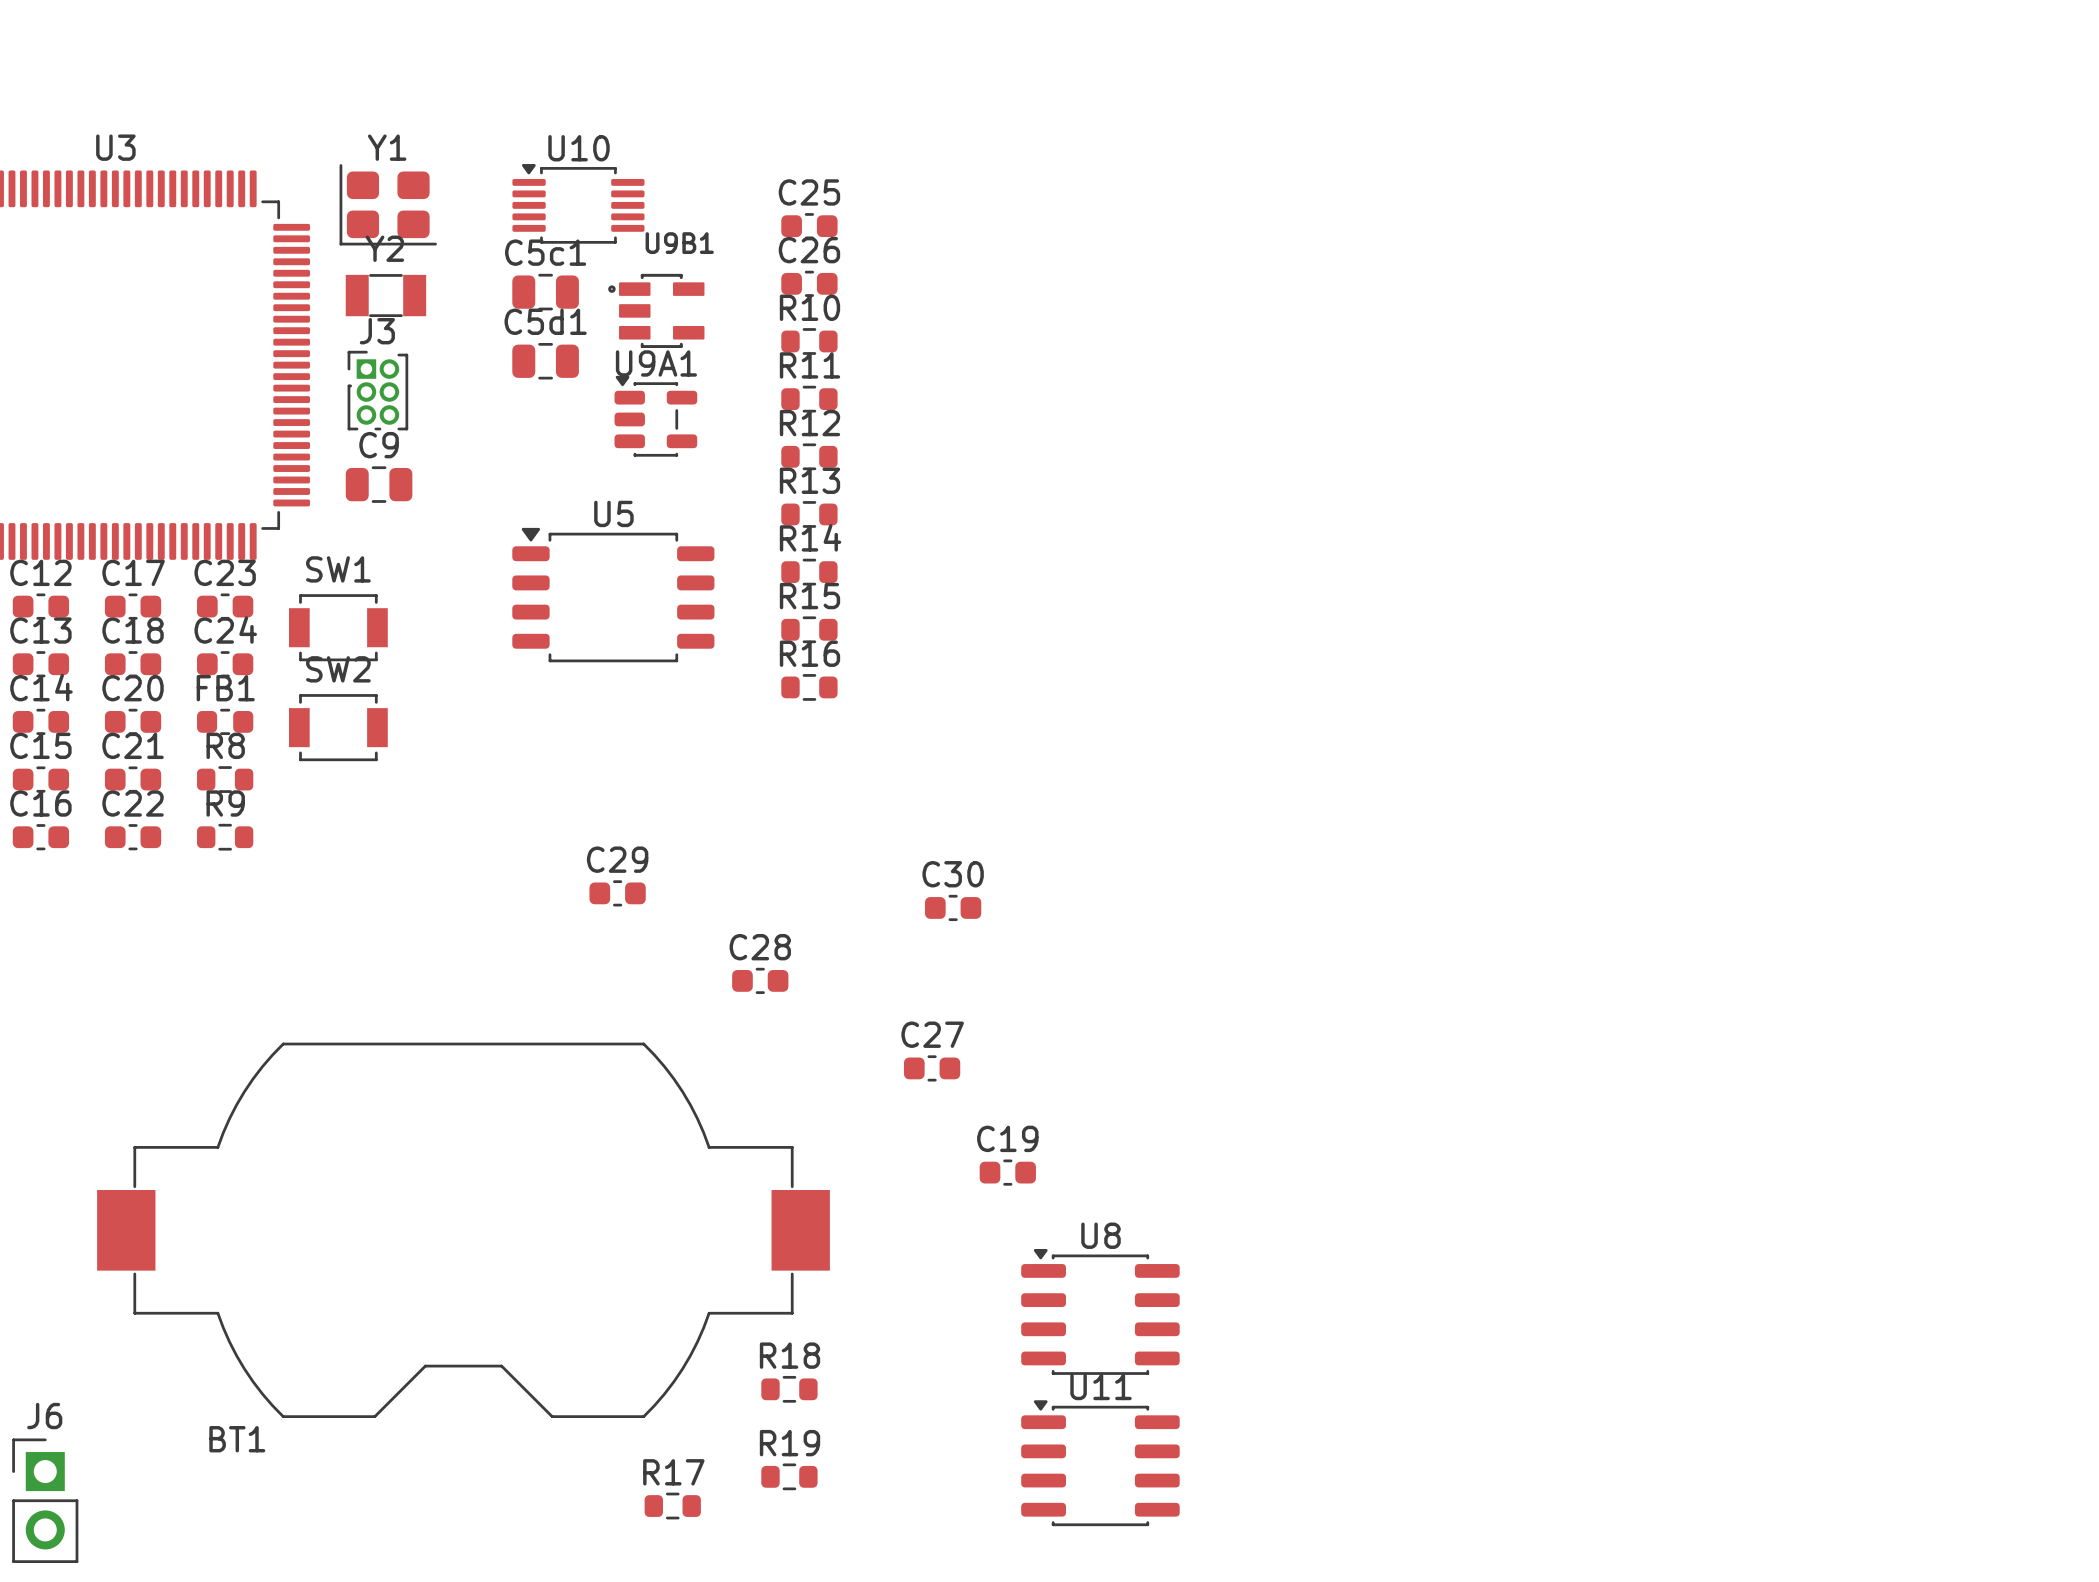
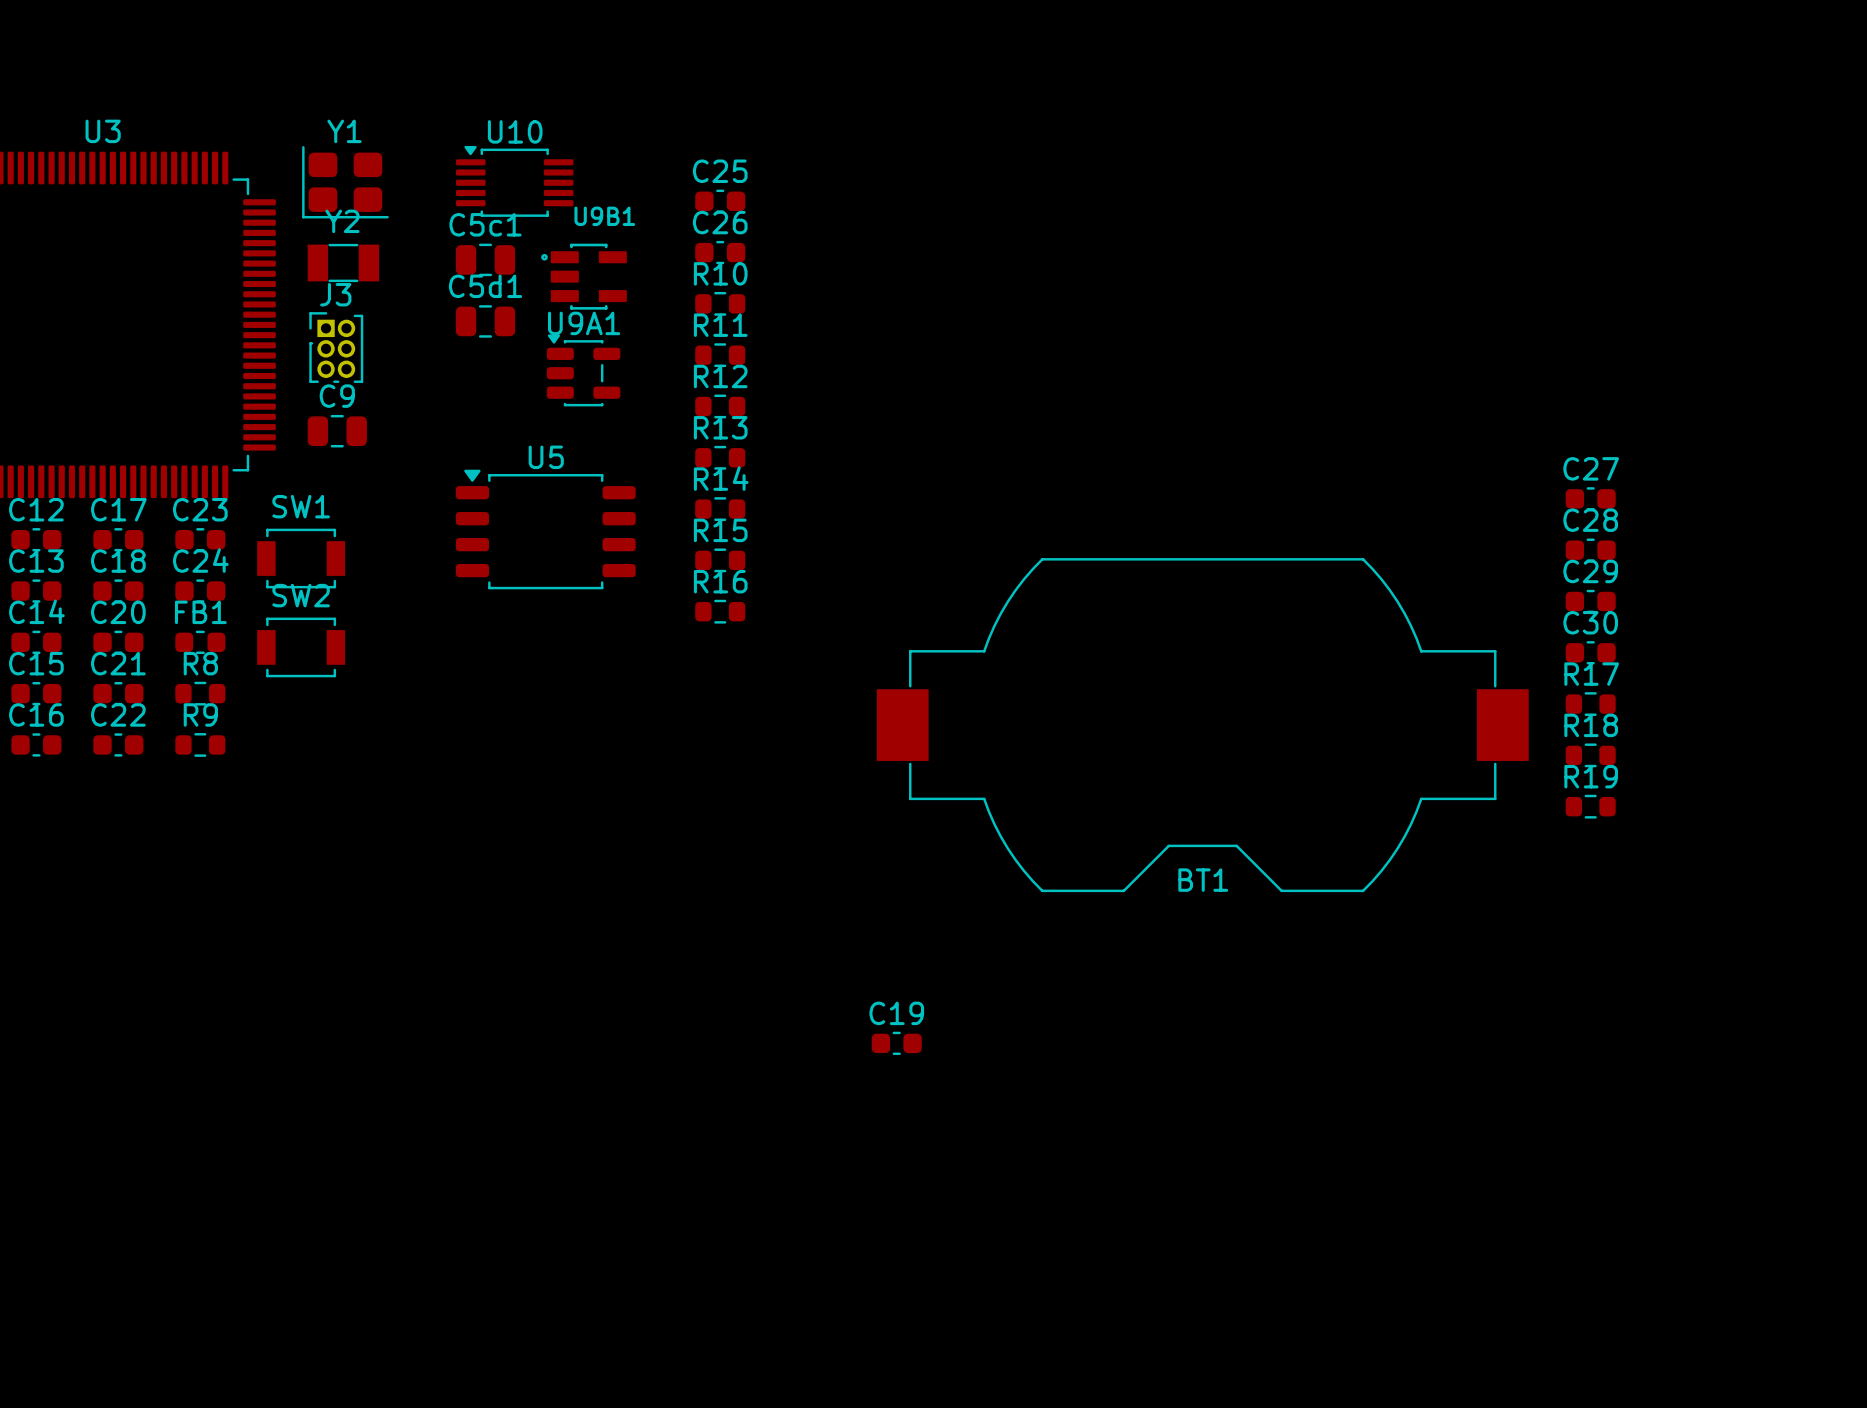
C29 position: (617, 893) -> (1590, 601)
C30 position: (953, 907) -> (1590, 652)
C28 position: (760, 980) -> (1590, 550)
C27 position: (932, 1068) -> (1590, 498)
BT1 position: (463, 1230) -> (1202, 725)
U8: (1100, 1311) -> none
R18 position: (789, 1389) -> (1590, 755)
BT1 name position: BT1 (237, 1439) -> BT1 (1203, 880)
U11: (1100, 1463) -> none
R19 position: (789, 1476) -> (1590, 806)
J6: (45, 1500) -> none
R17 position: (672, 1506) -> (1590, 704)

